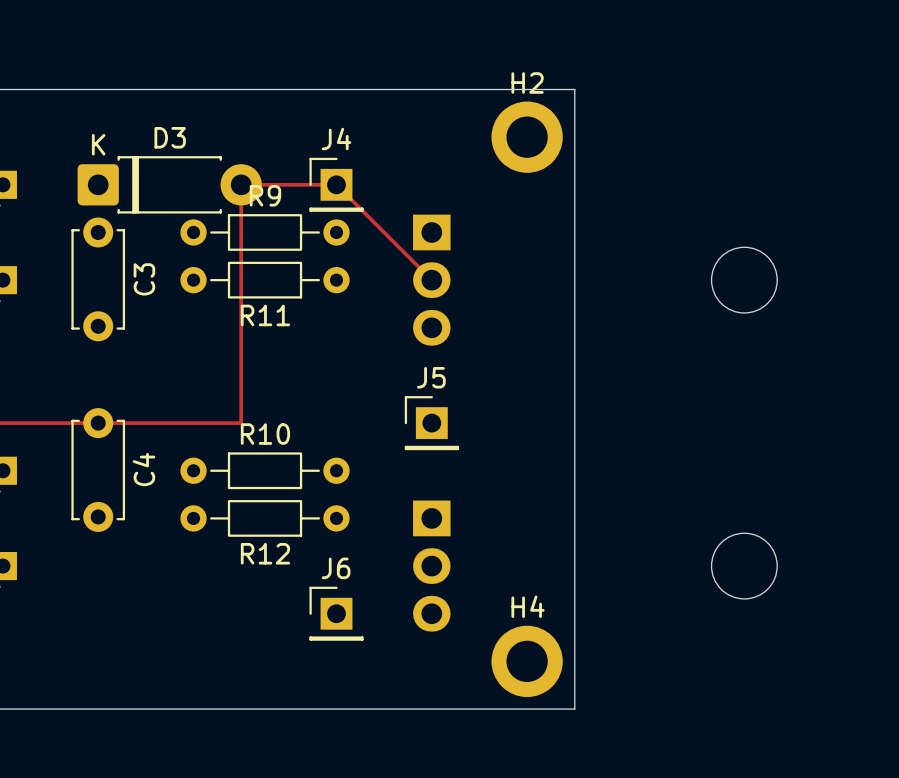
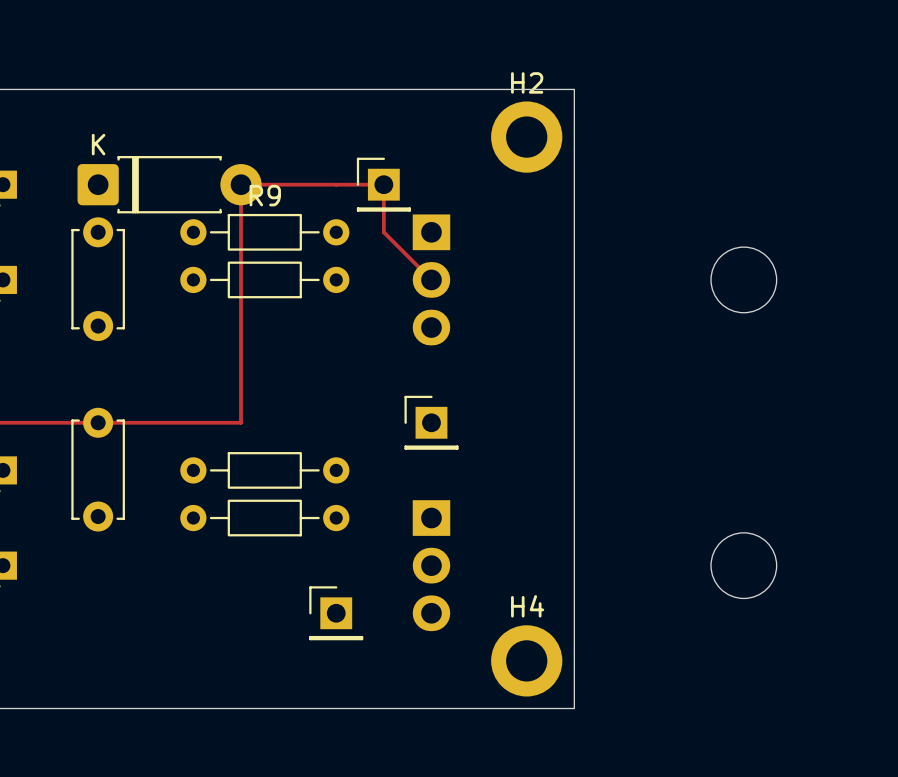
D3 name: D3 (170, 137) -> none
track: (336, 184) (384, 232) -> (336, 184) (383, 184) (383, 232)
J4: (336, 184) -> none
part: none -> (383, 184)
C3 name: C3 (144, 279) -> none
R11 name: R11 (265, 315) -> none
J5 name: J5 (431, 377) -> none
R10 name: R10 (265, 434) -> none
C4 name: C4 (143, 469) -> none
R12 name: R12 (265, 553) -> none
J6 name: J6 (336, 568) -> none

